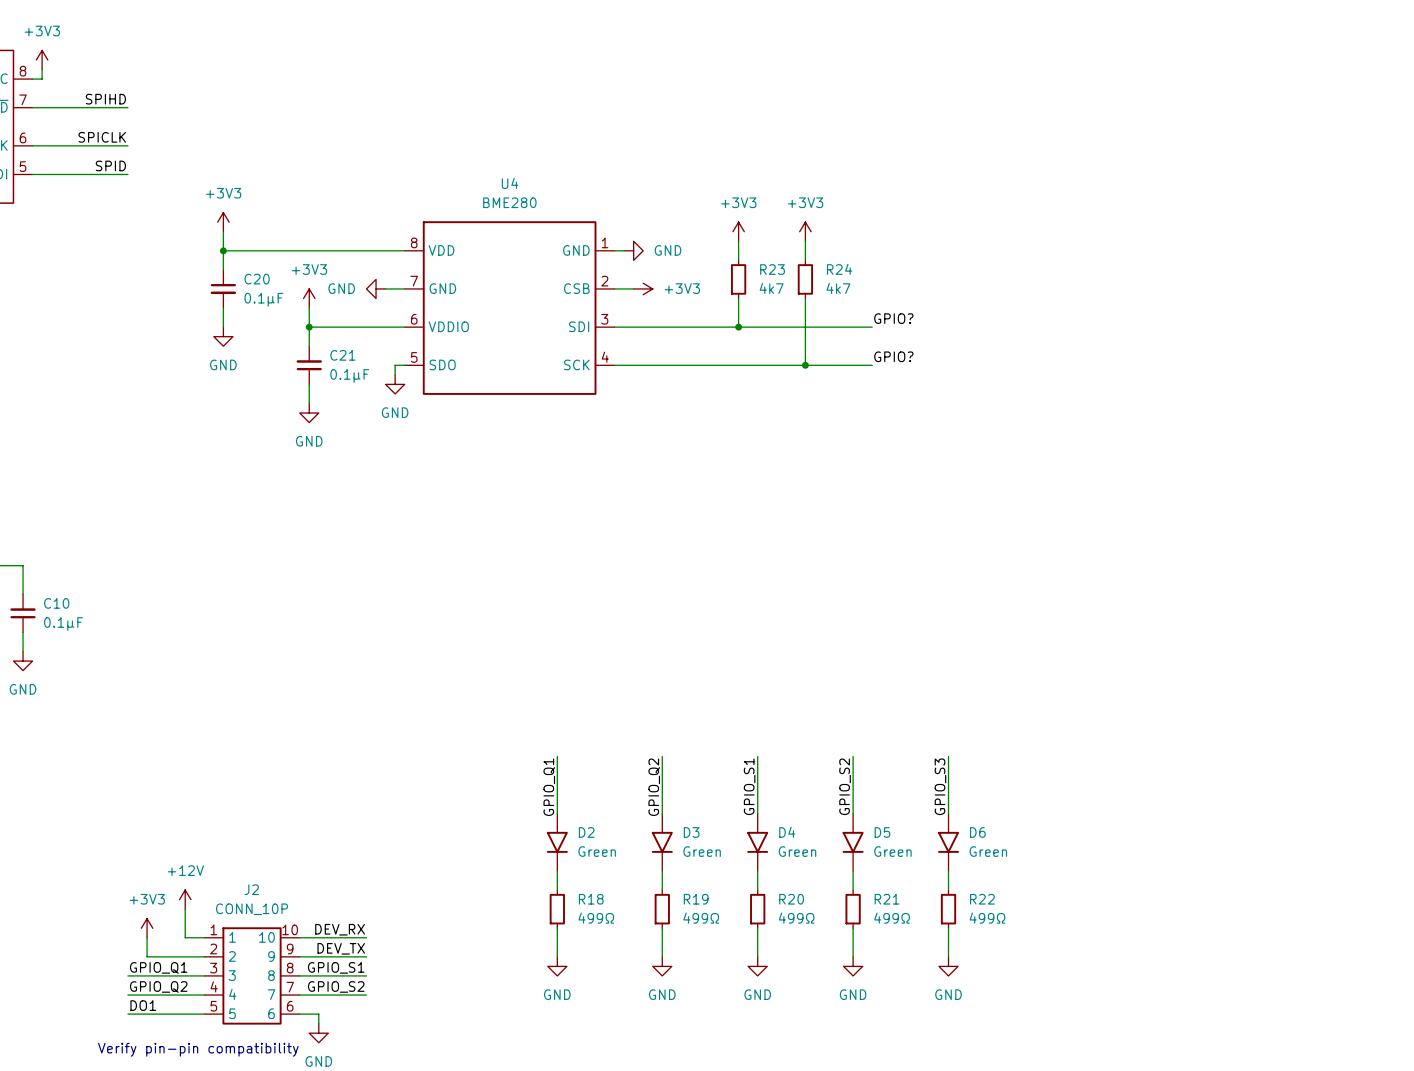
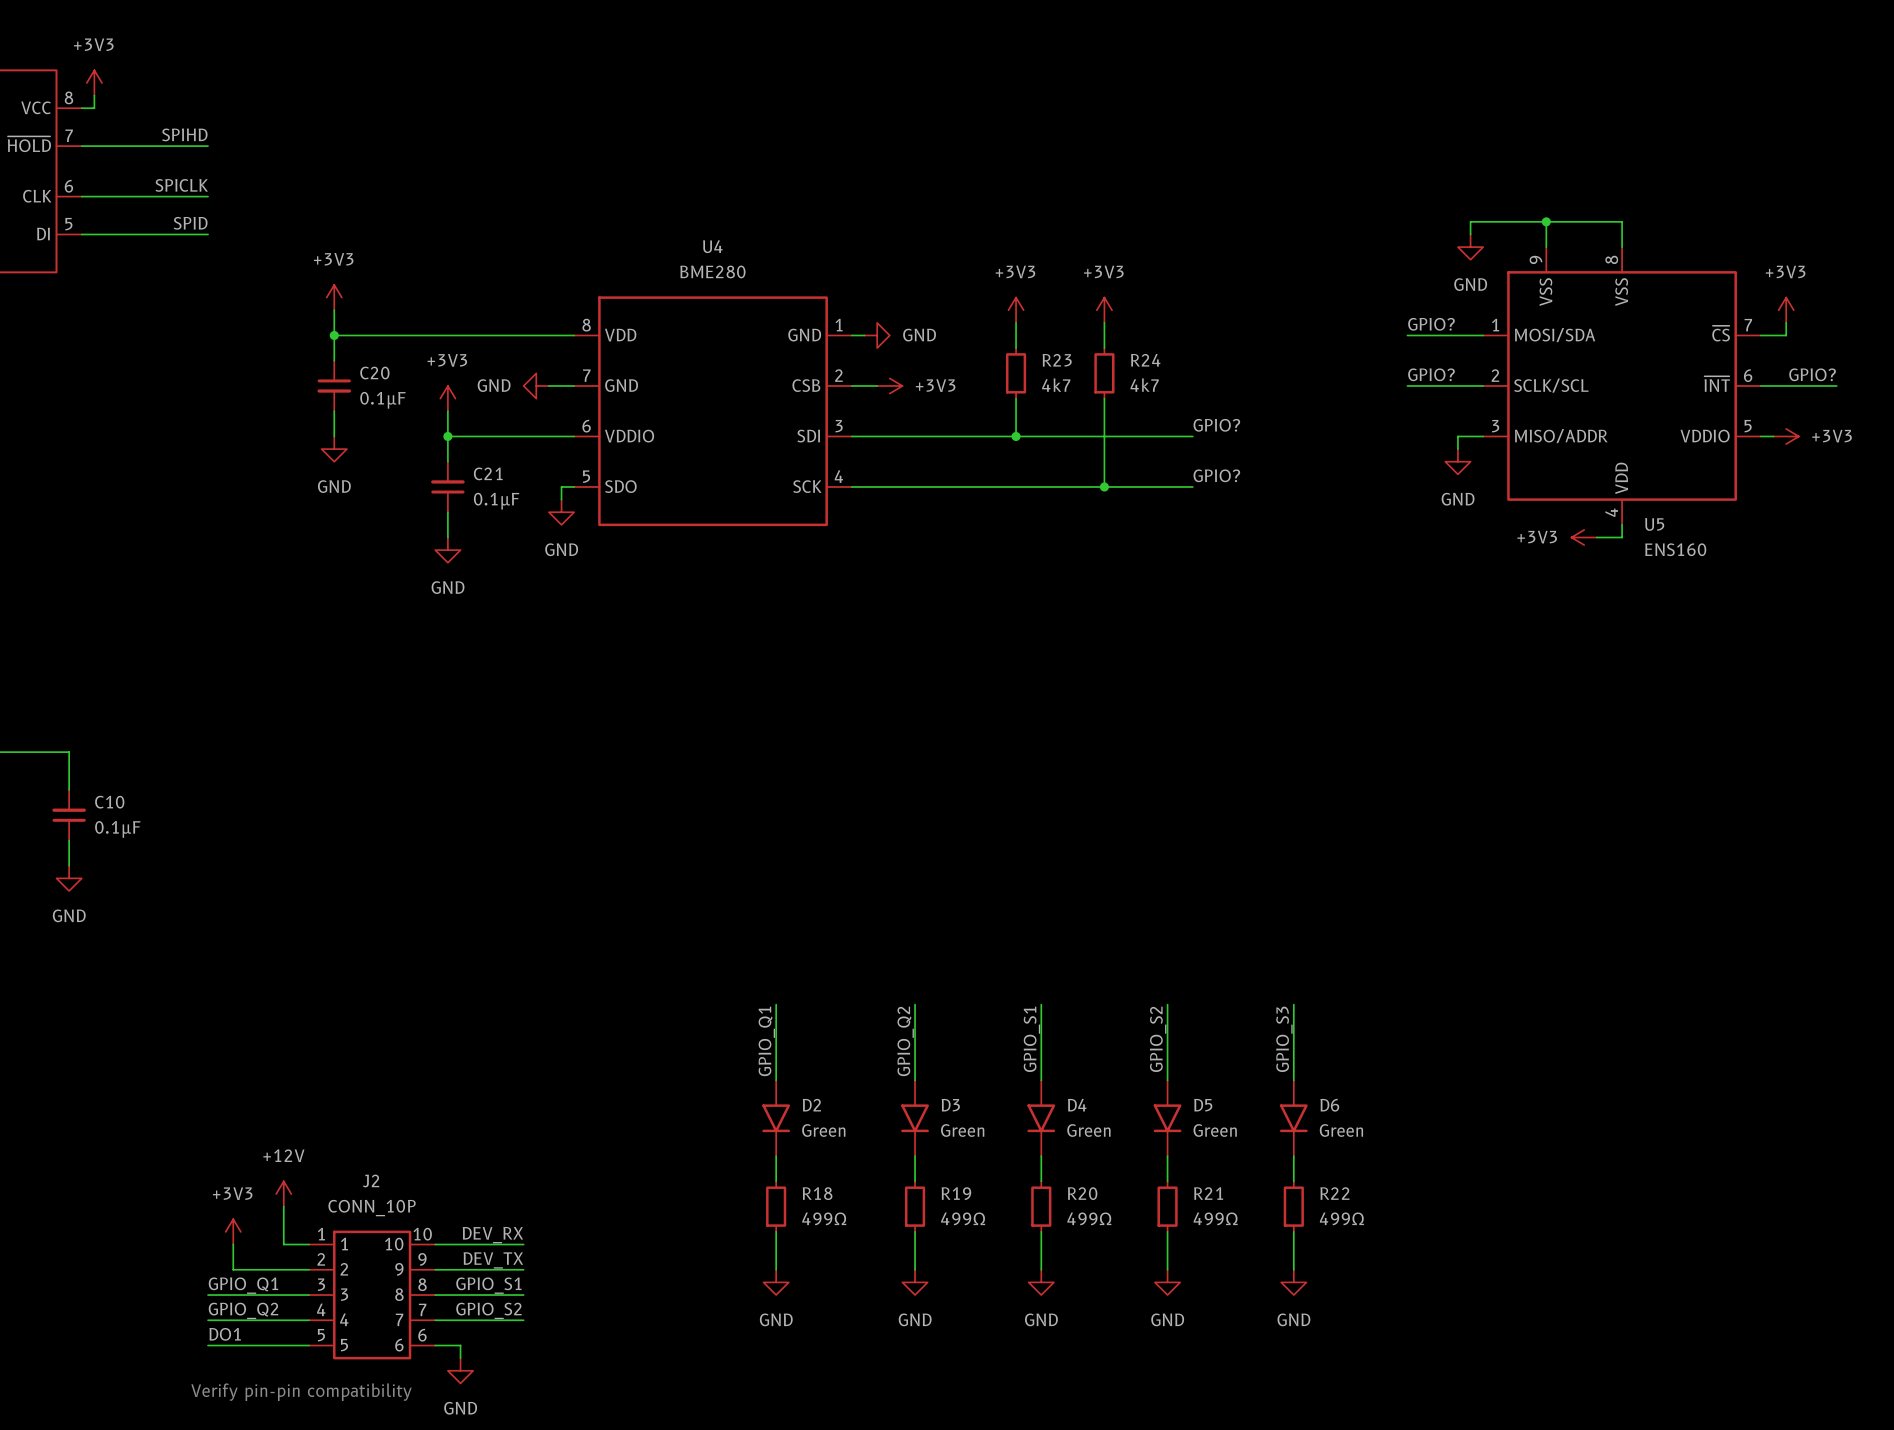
wire: none -> (1546, 221) (1546, 247)
junction: none -> (1546, 221)
wire: none -> (1470, 234) (1470, 221) (1622, 221) (1622, 247)
power symbol: none -> GND (1470, 247)
power symbol: none -> +3V3 (1786, 310)
wire: none -> (1786, 322) (1786, 335) (1760, 335)
label: none -> GPIO? (1431, 324)
wire: none -> (1407, 335) (1483, 335)
label: none -> GPIO? (1431, 374)
label: none -> GPIO? (1812, 374)
wire: none -> (1407, 385) (1483, 385)
U5: none -> (1622, 385)
wire: none -> (1760, 385) (1836, 385)
wire: none -> (1483, 436) (1457, 436) (1457, 449)
wire: none -> (1760, 436) (1773, 436)
power symbol: none -> +3V3 (1786, 436)
power symbol: none -> GND (1457, 461)
wire: none -> (1622, 524) (1622, 537) (1596, 537)
power symbol: none -> +3V3 (1584, 537)

